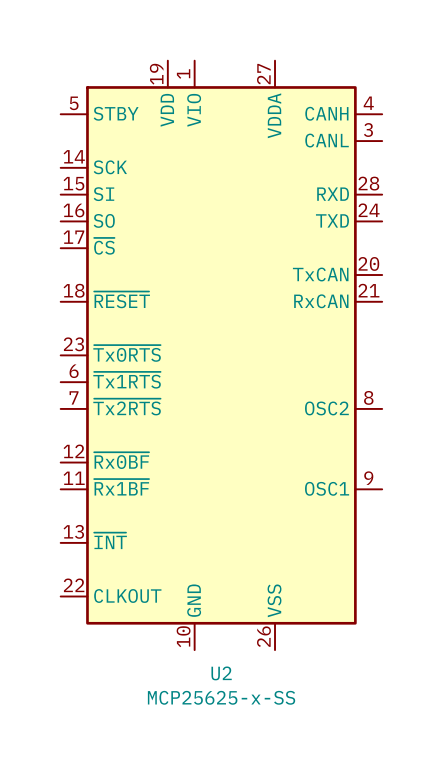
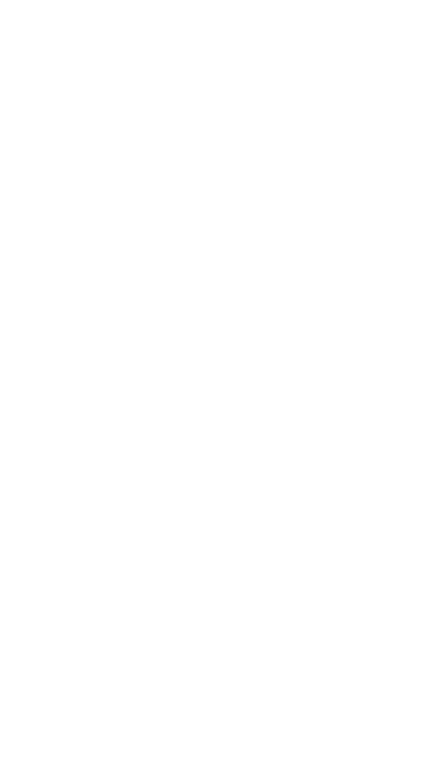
U2: MCP25625-x-SS (221, 355) -> none

